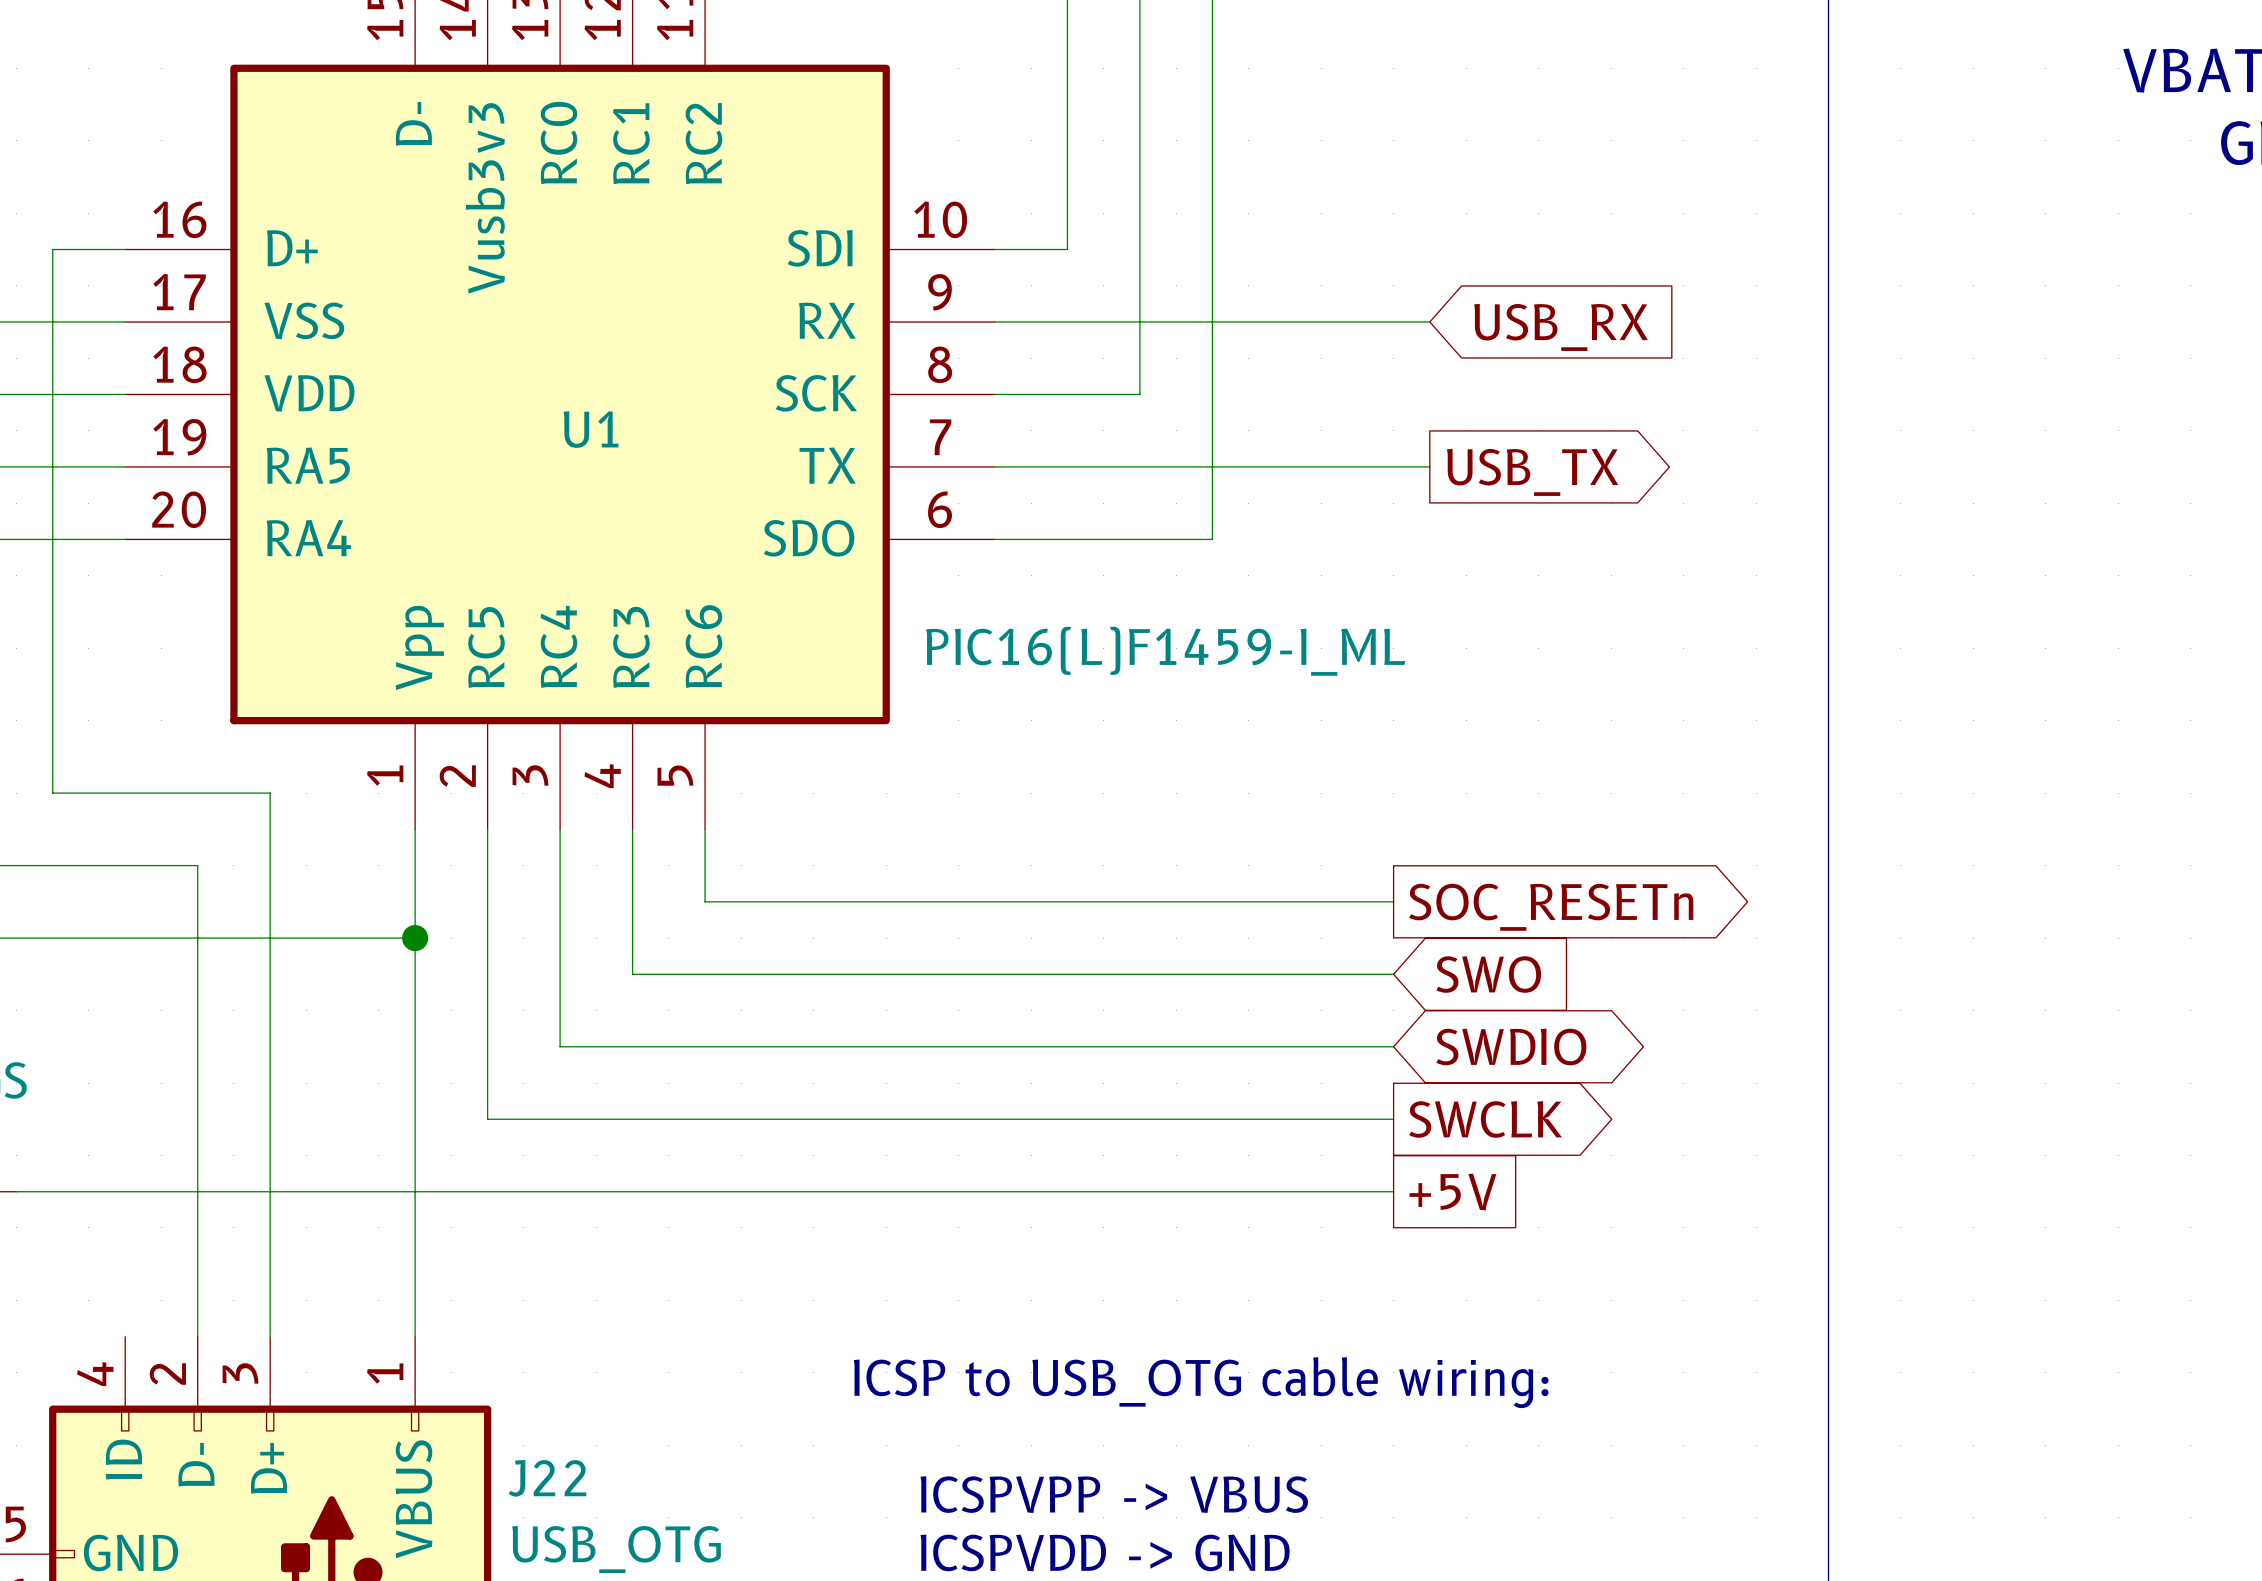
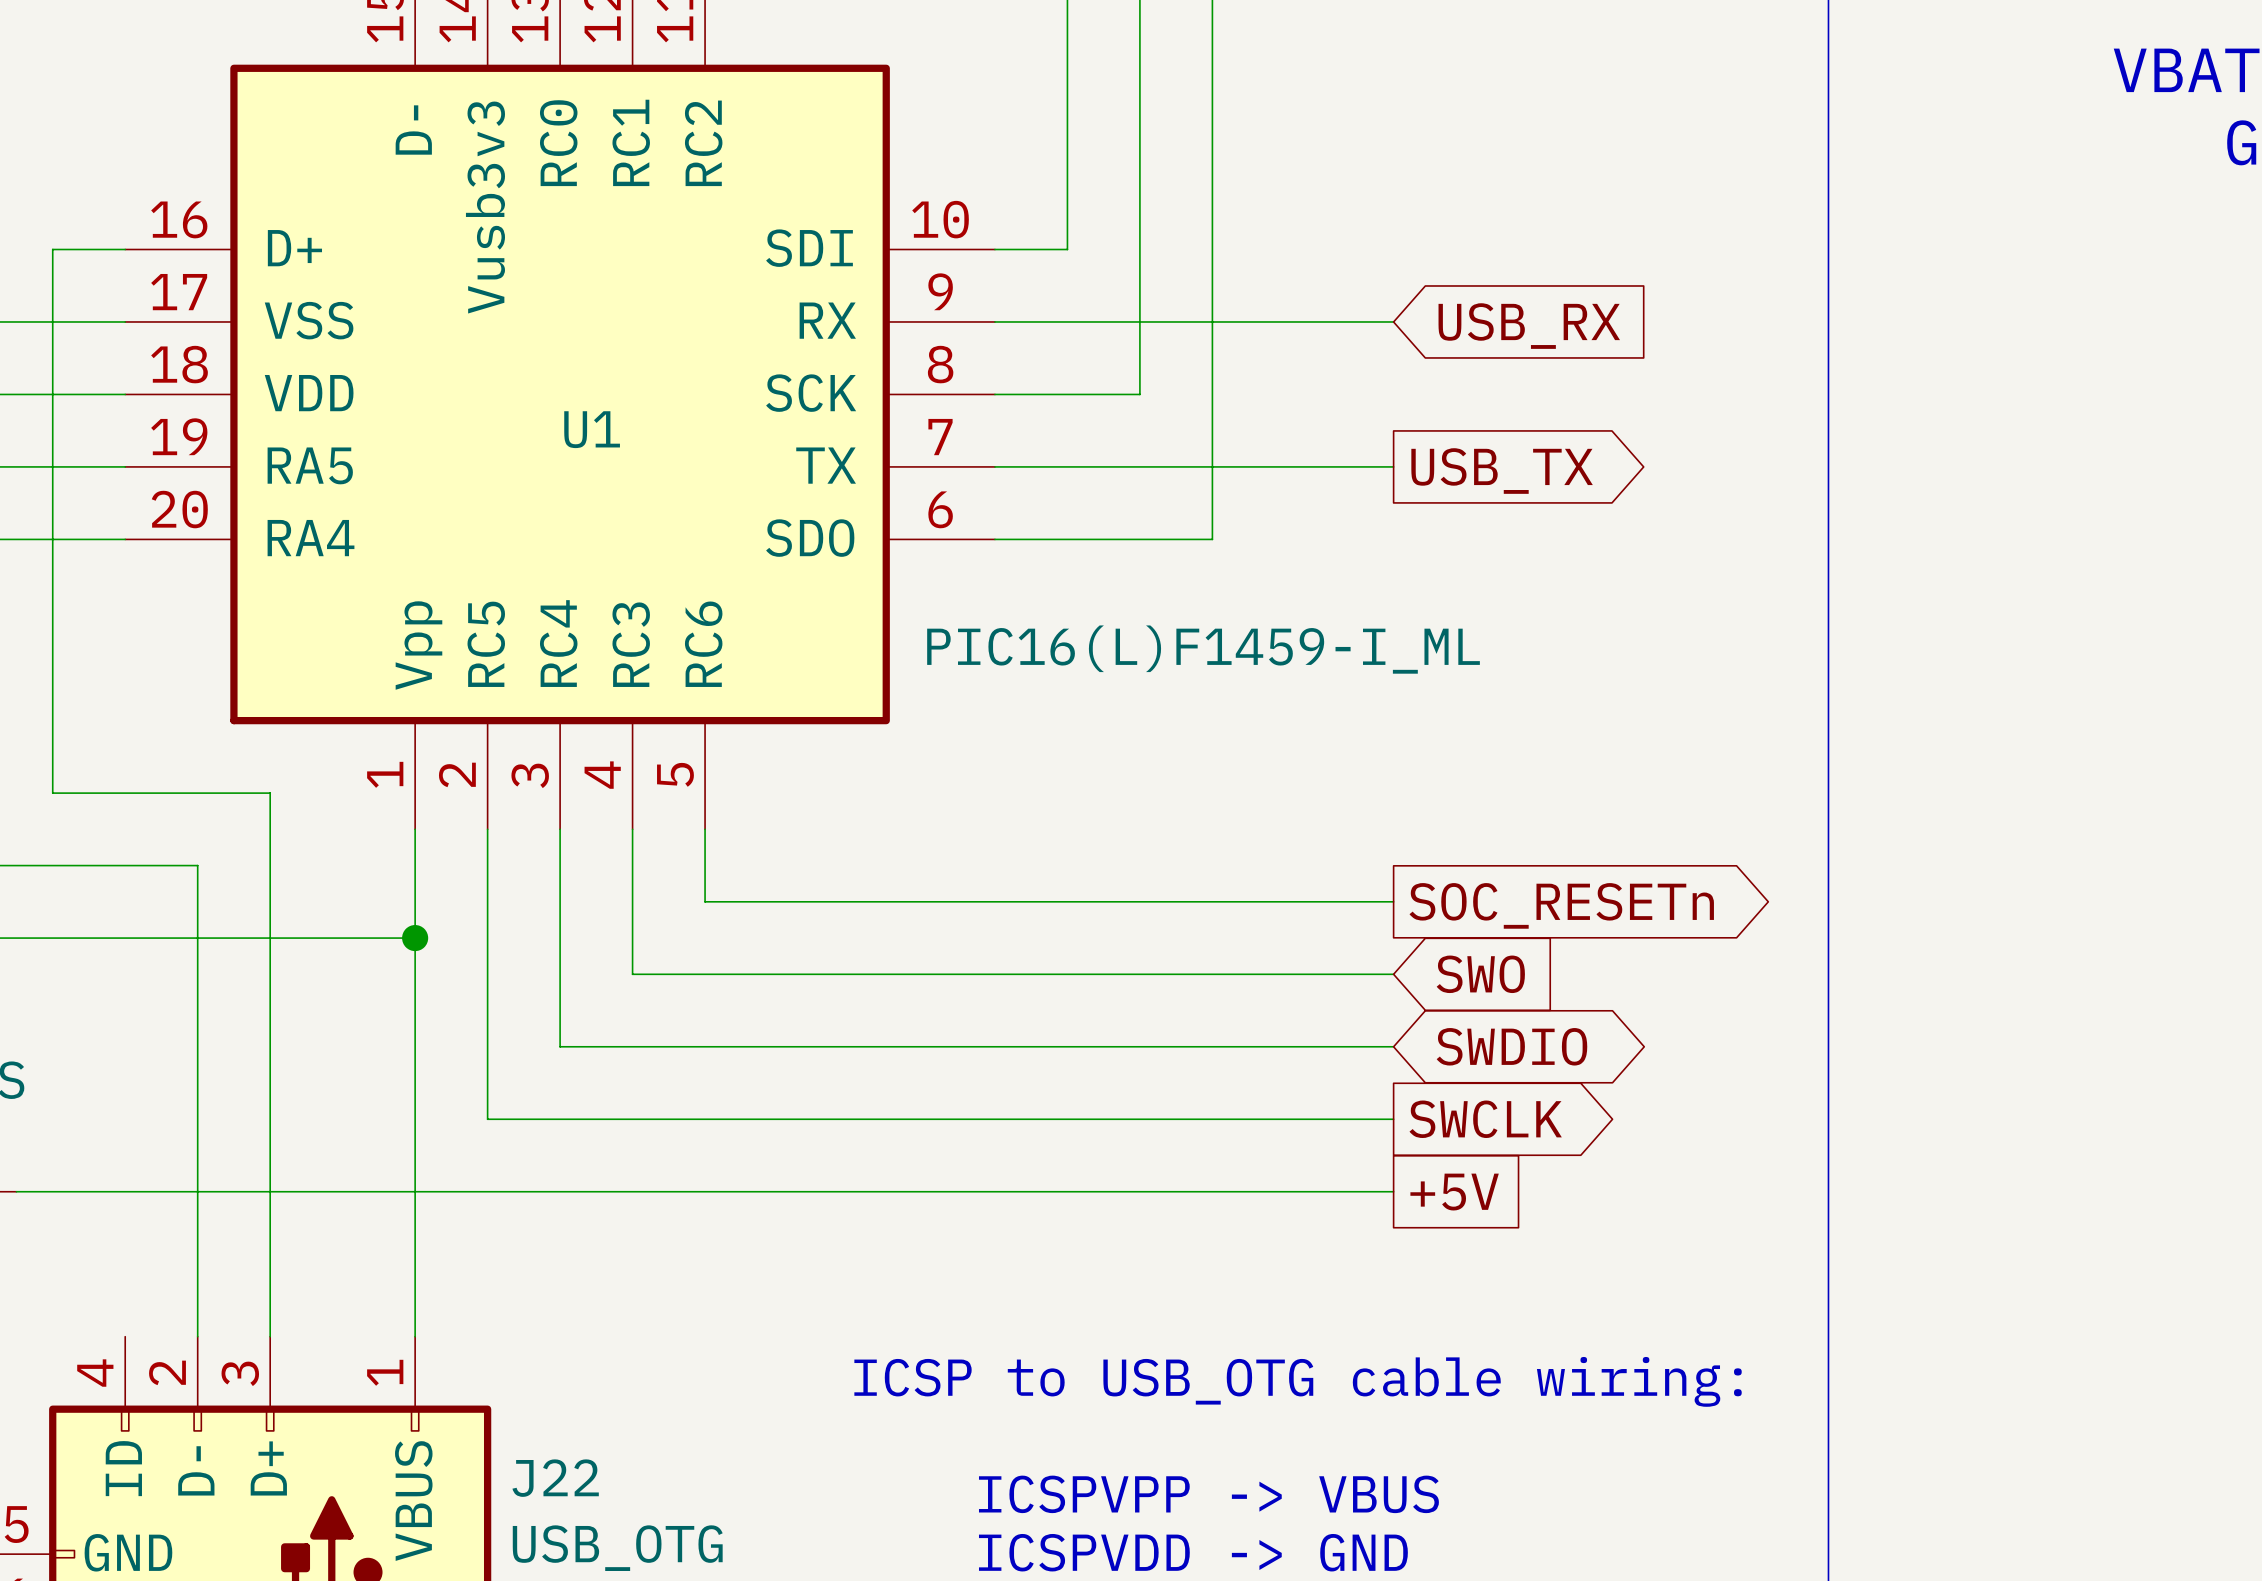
wire: (1393, 321) (1429, 321) -> none
global label position: USB_RX (1561, 327) -> USB_RX (1529, 326)
wire: (1393, 466) (1429, 466) -> none
global label position: USB_TX (1532, 472) -> USB_TX (1502, 471)

